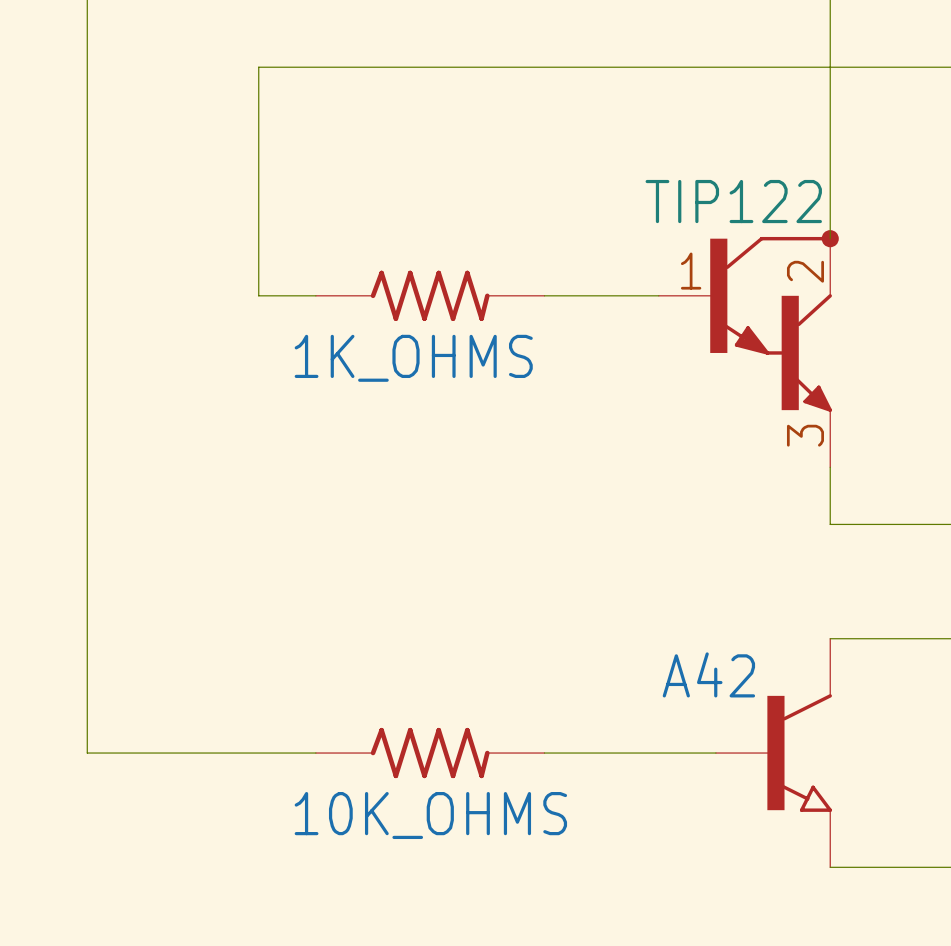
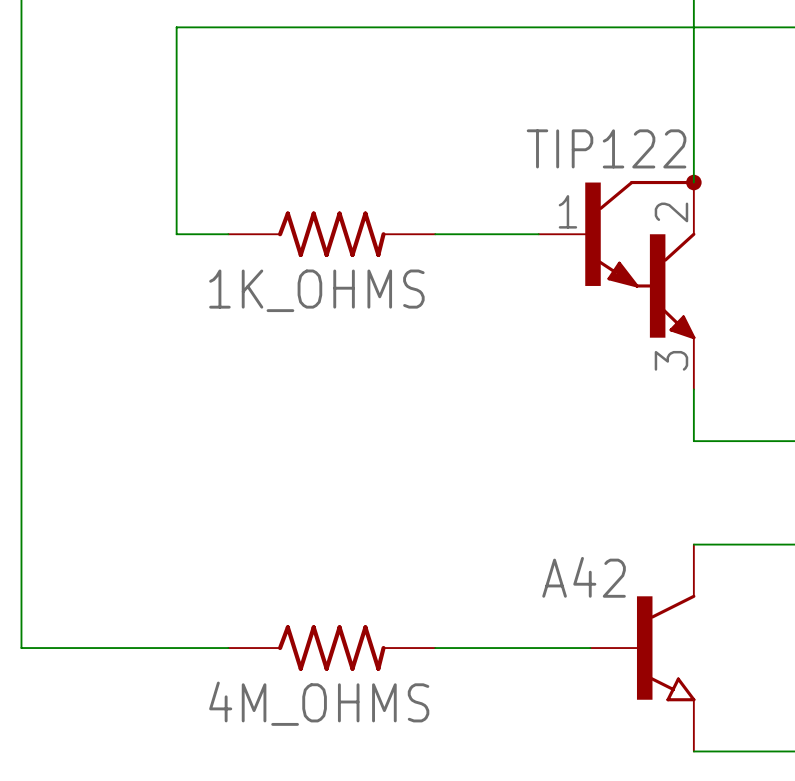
10K_OHMS name: 10K_OHMS (430, 815) -> 4M_OHMS (319, 703)

